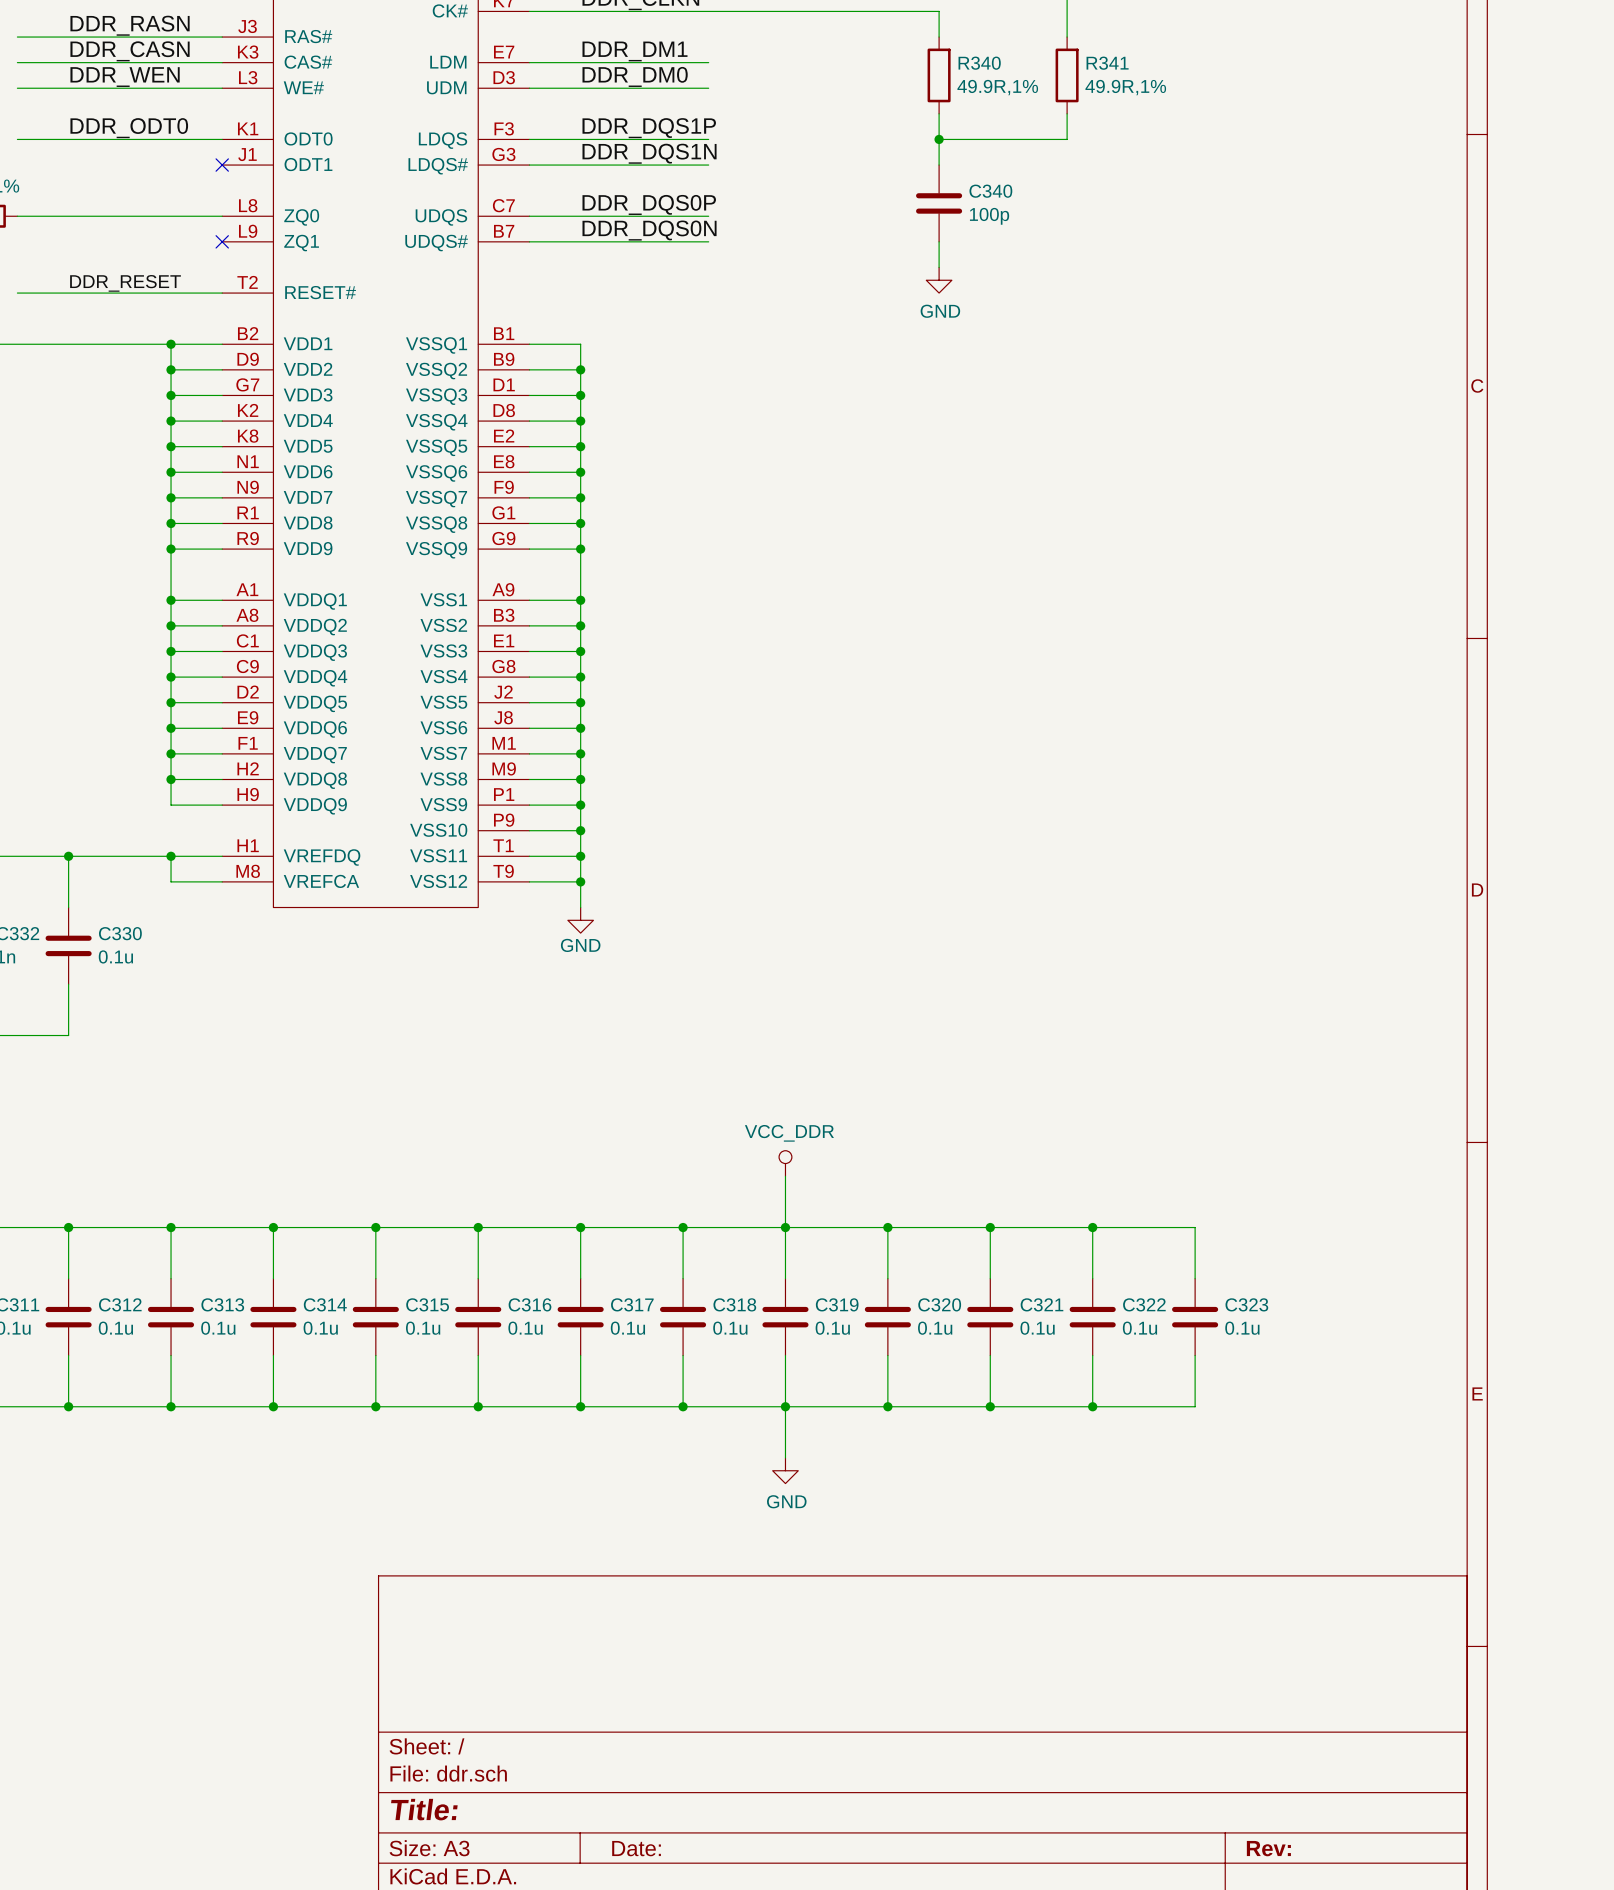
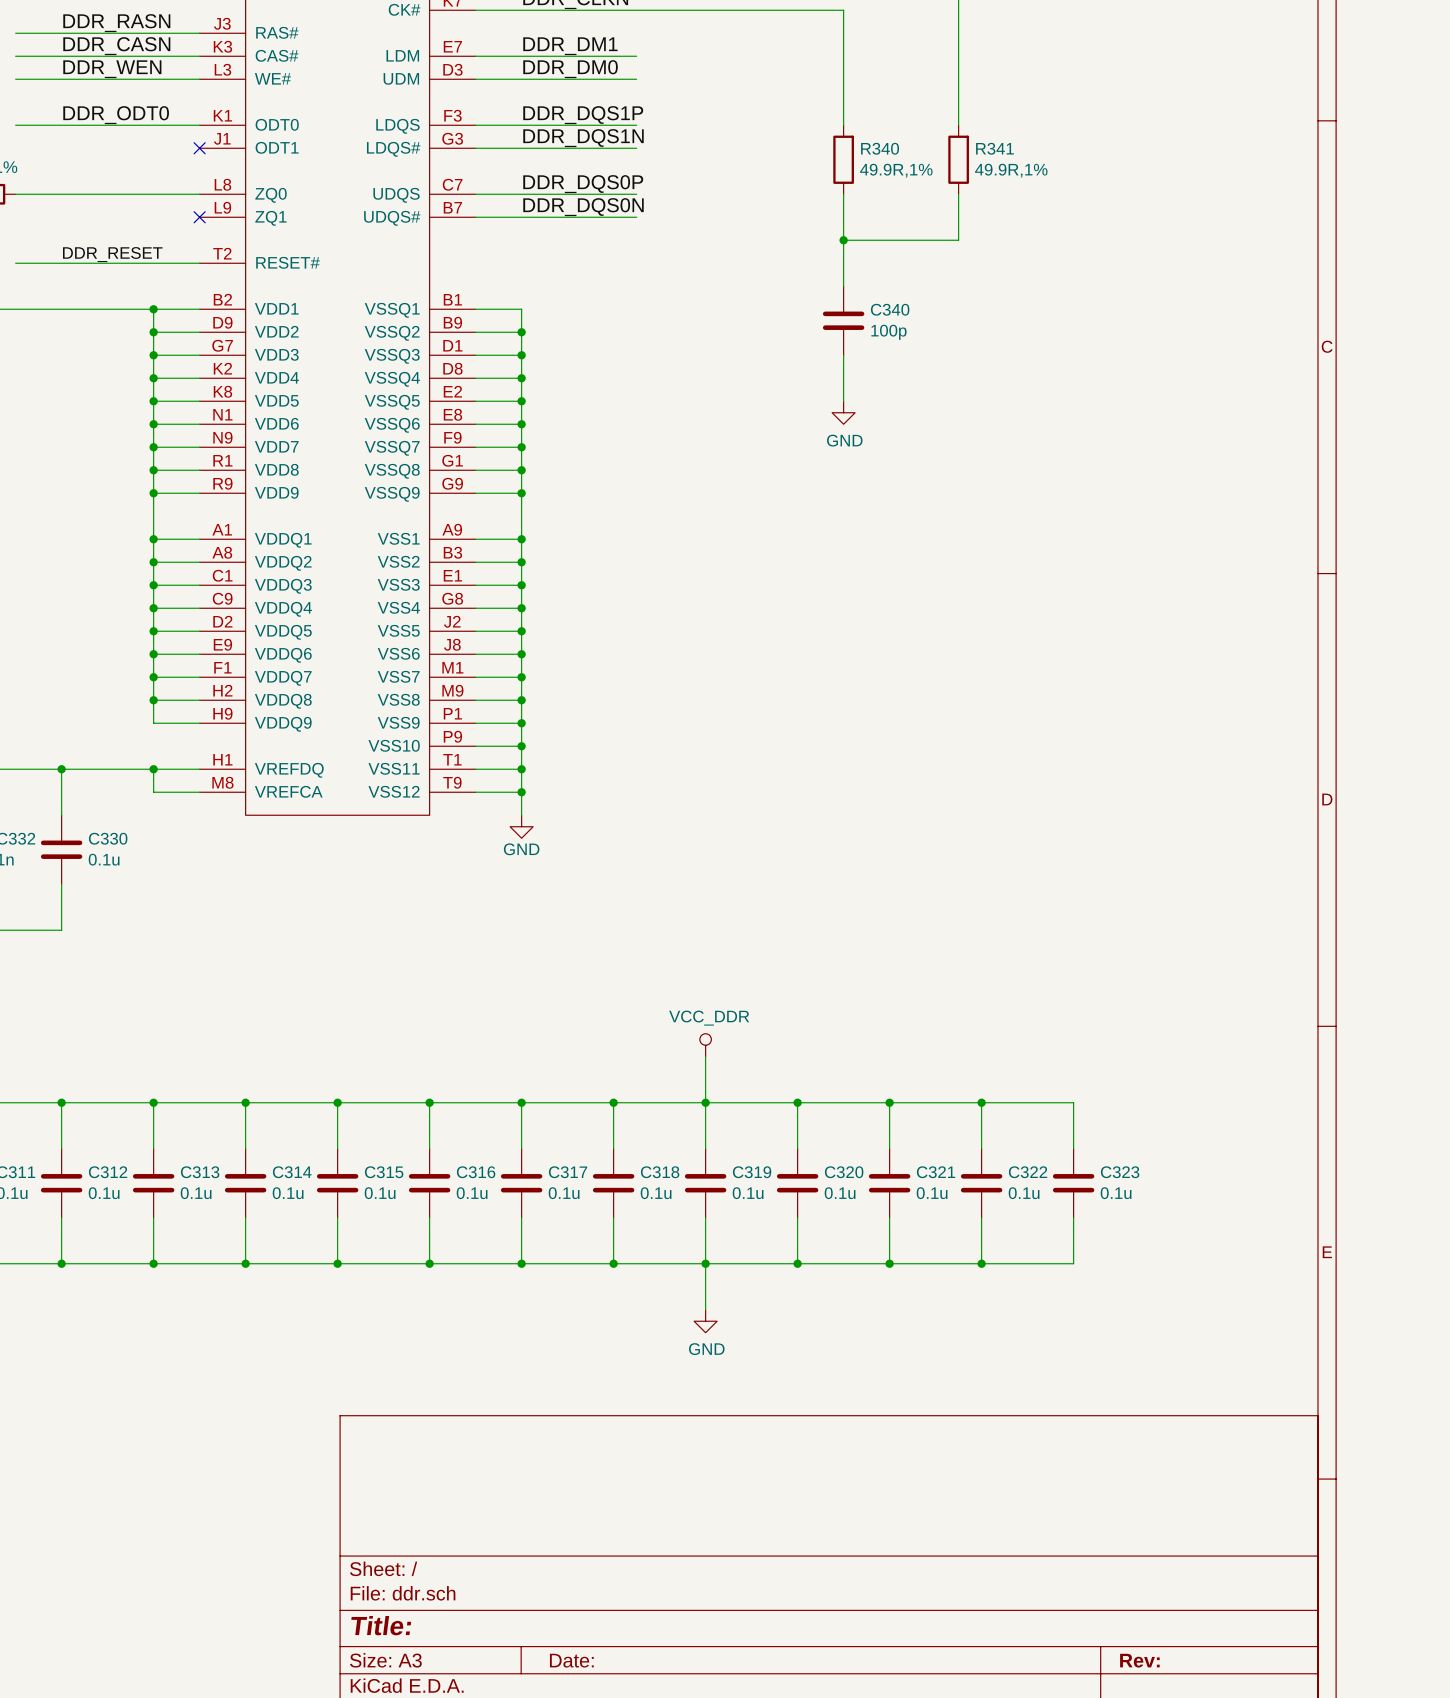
wire: none -> (843, 33) (843, 102)
wire: none -> (958, 33) (958, 102)
R340 position: (939, 75) -> (843, 159)
R341 position: (1067, 75) -> (958, 159)
junction: (939, 139) -> none
wire: (1067, 139) (939, 139) (939, 165) -> none
C340 position: (939, 203) -> (843, 320)
wire: none -> (958, 194) (958, 240) (843, 240) (843, 286)
junction: none -> (843, 240)
power symbol position: GND (939, 280) -> GND (843, 412)
wire: none -> (843, 355) (843, 401)

